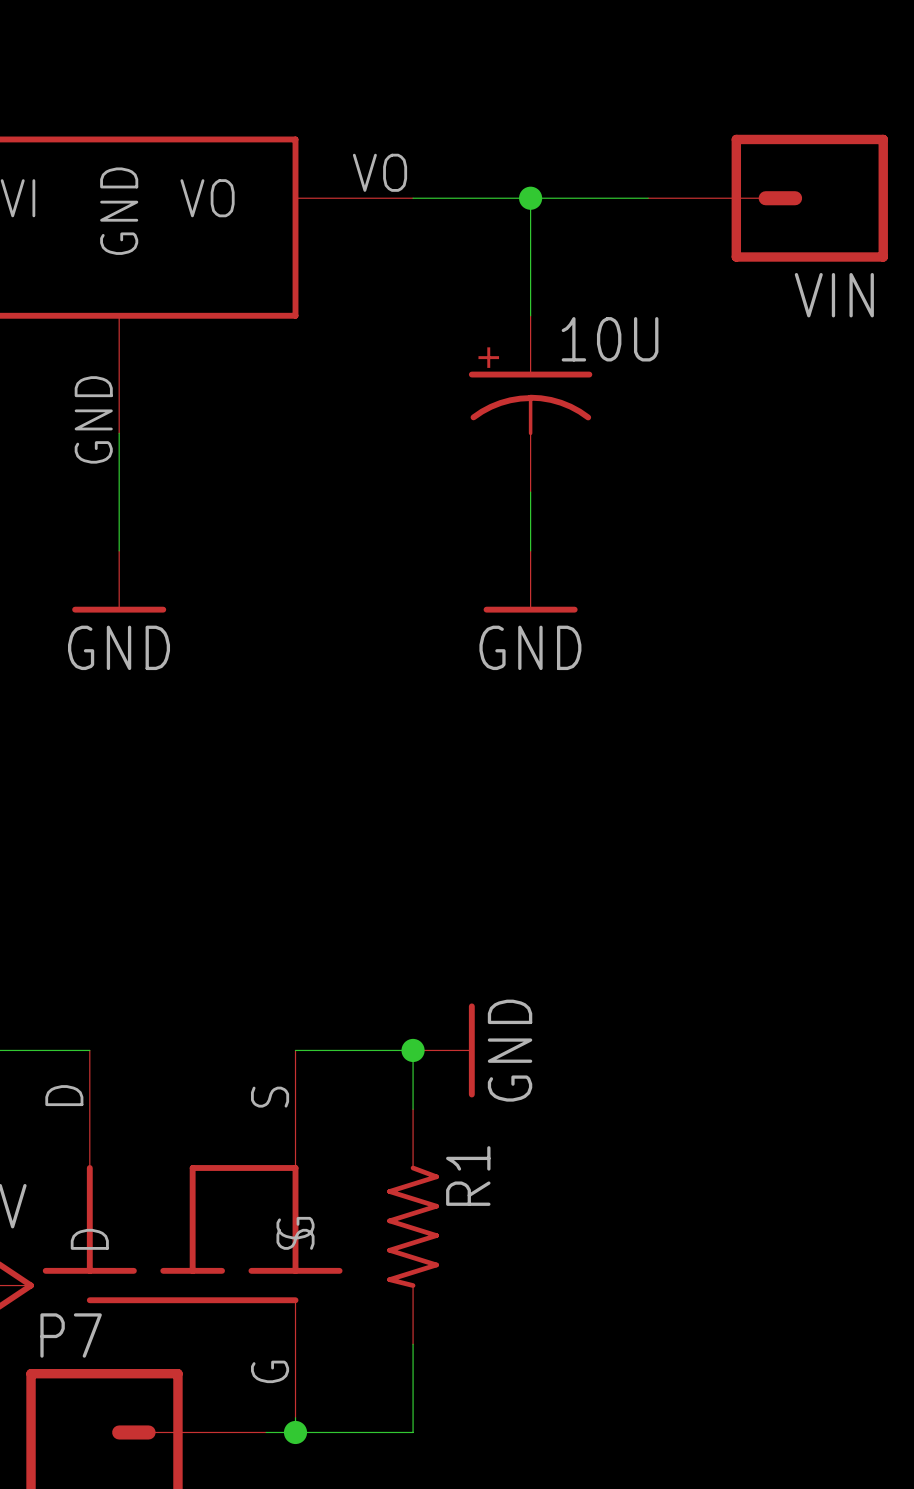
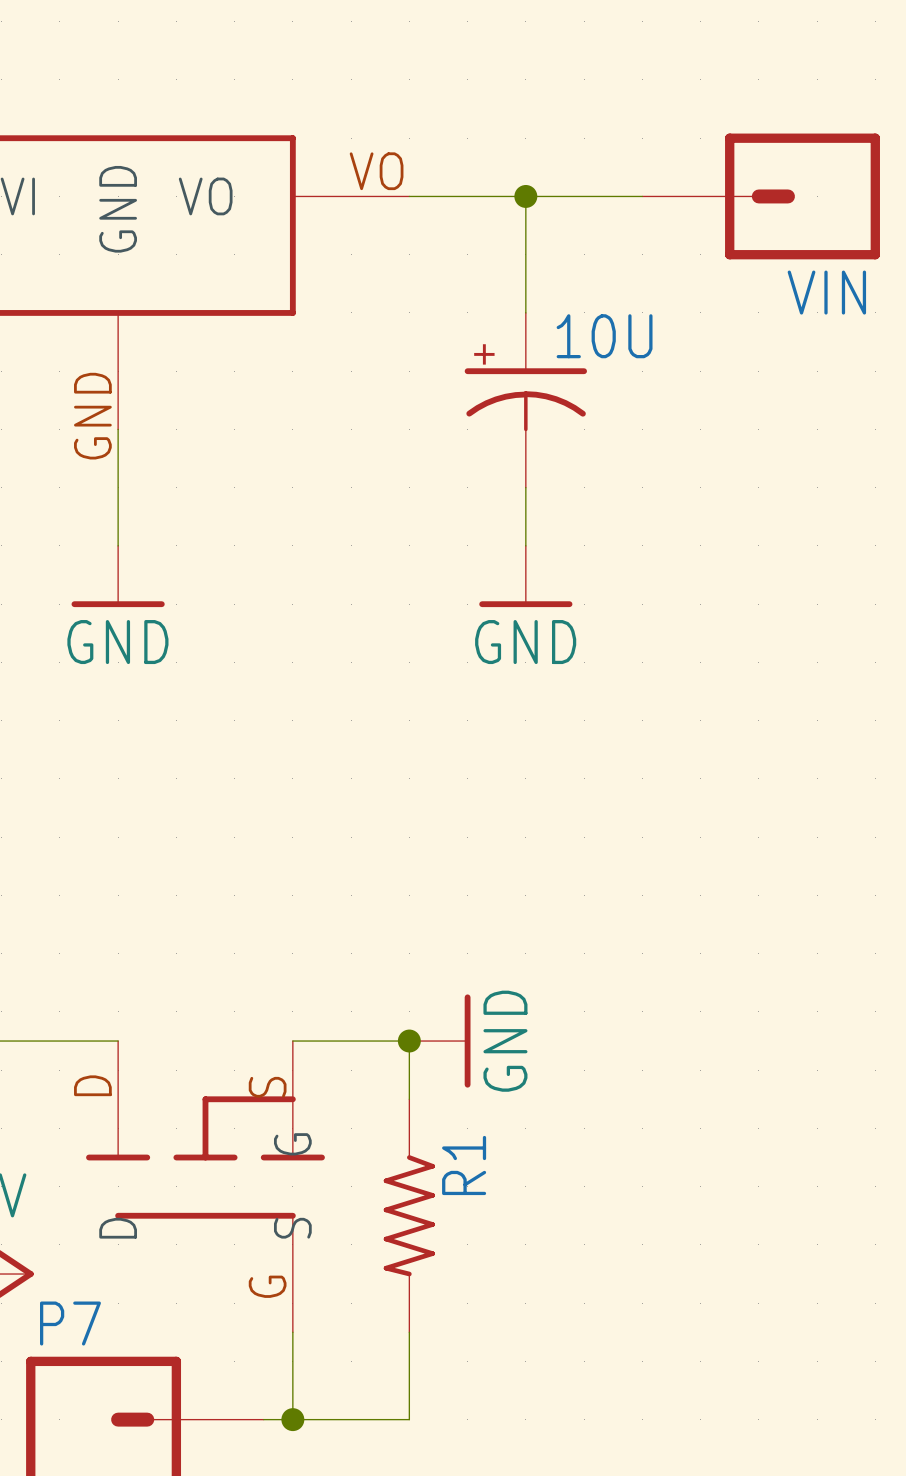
wire: none -> (88, 1041) (118, 1041)
part: none -> (205, 1186)
part: (192, 1234) -> none

